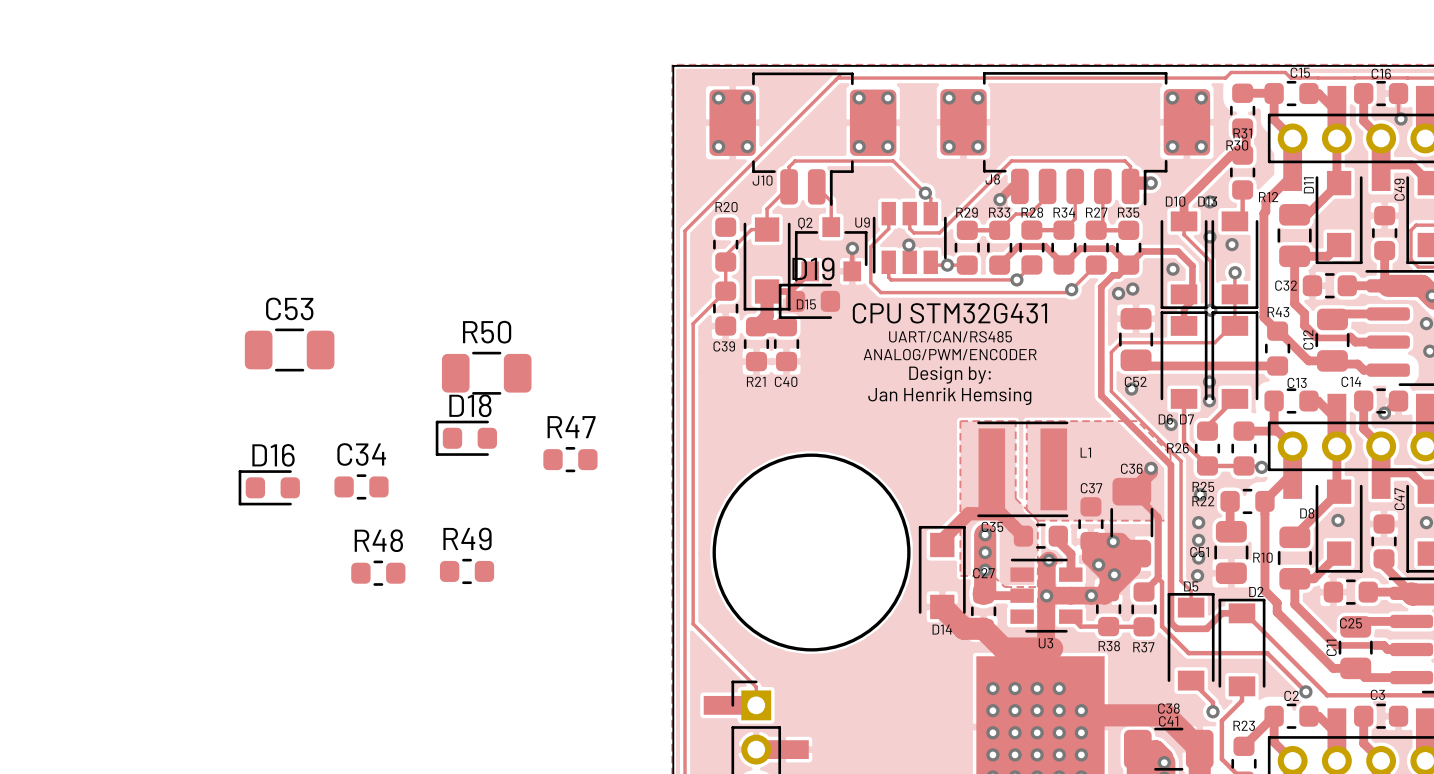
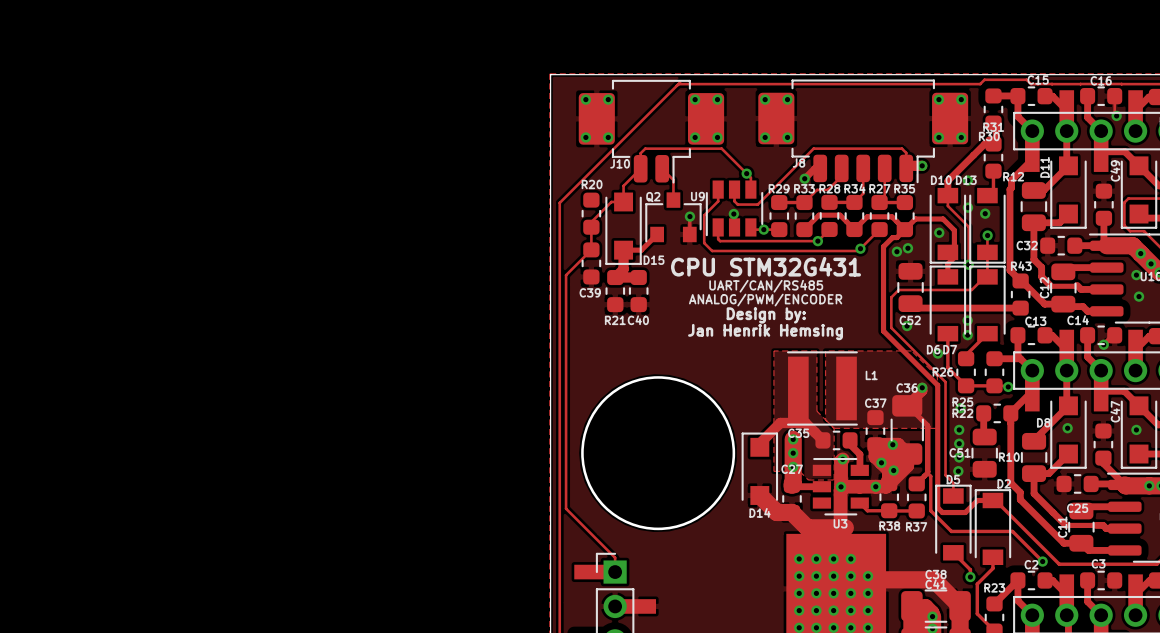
D19: (809, 301) -> none
C53: (289, 350) -> none
R50: (486, 373) -> none
D18: (466, 438) -> none
R47: (570, 459) -> none
C34: (361, 486) -> none
D16: (269, 487) -> none
R49: (467, 571) -> none
R48: (378, 573) -> none

